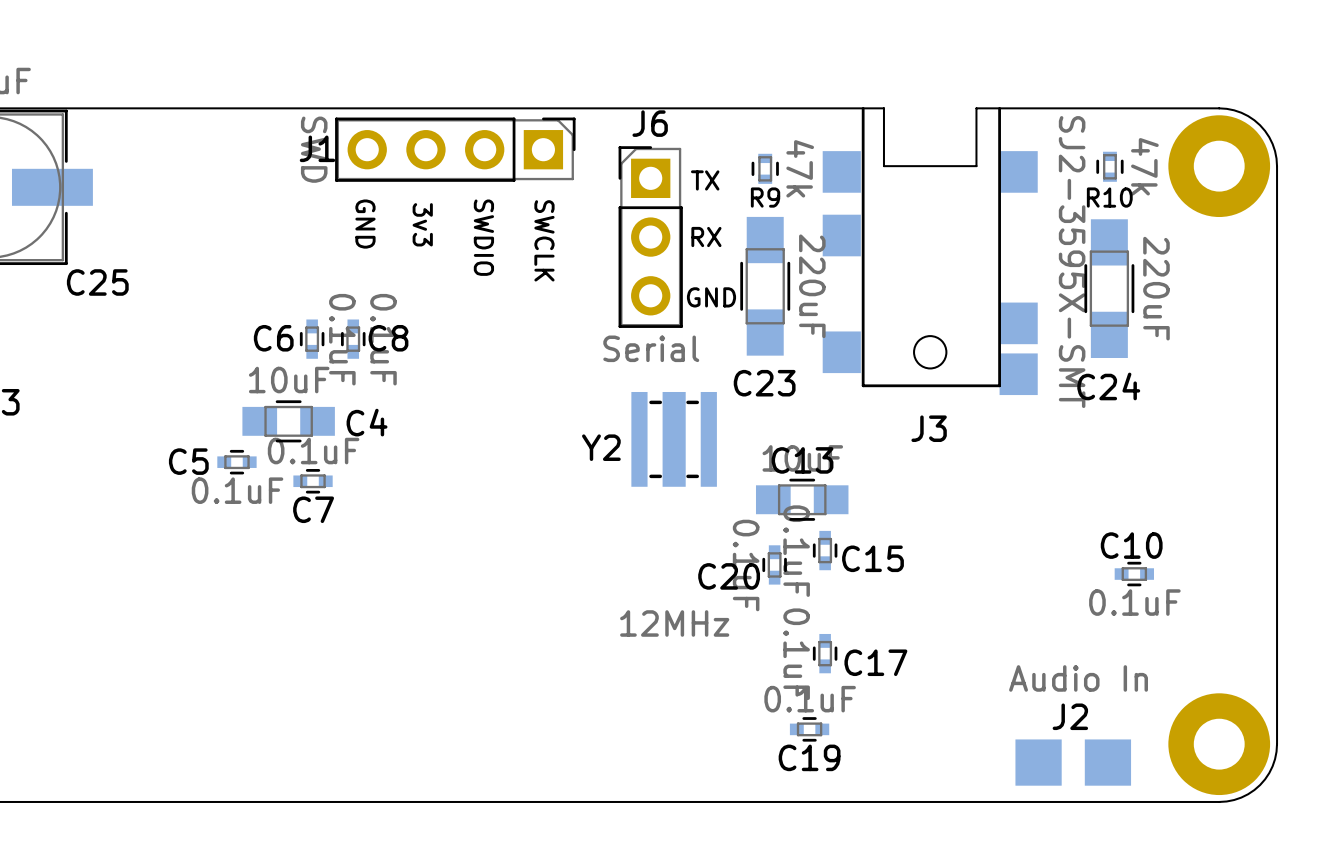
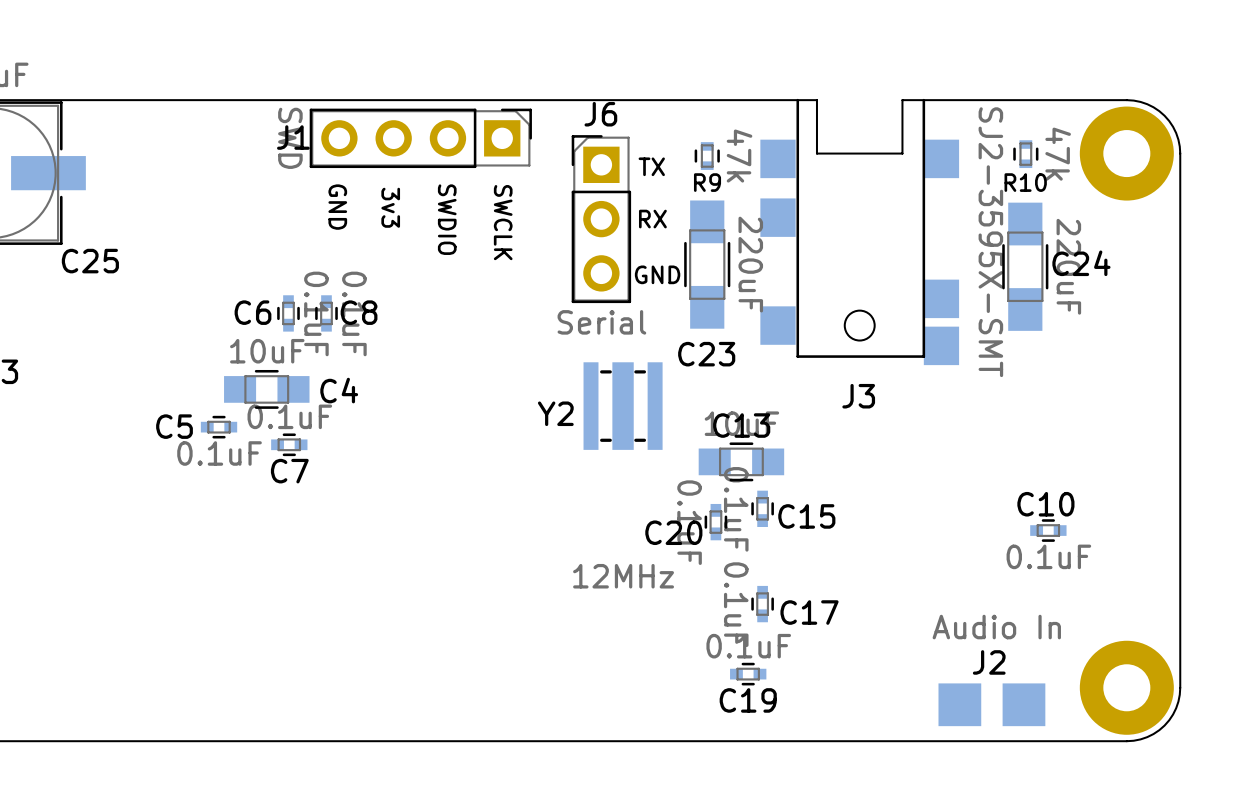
C24 name position: C24 (1108, 386) -> C24 (1081, 263)

